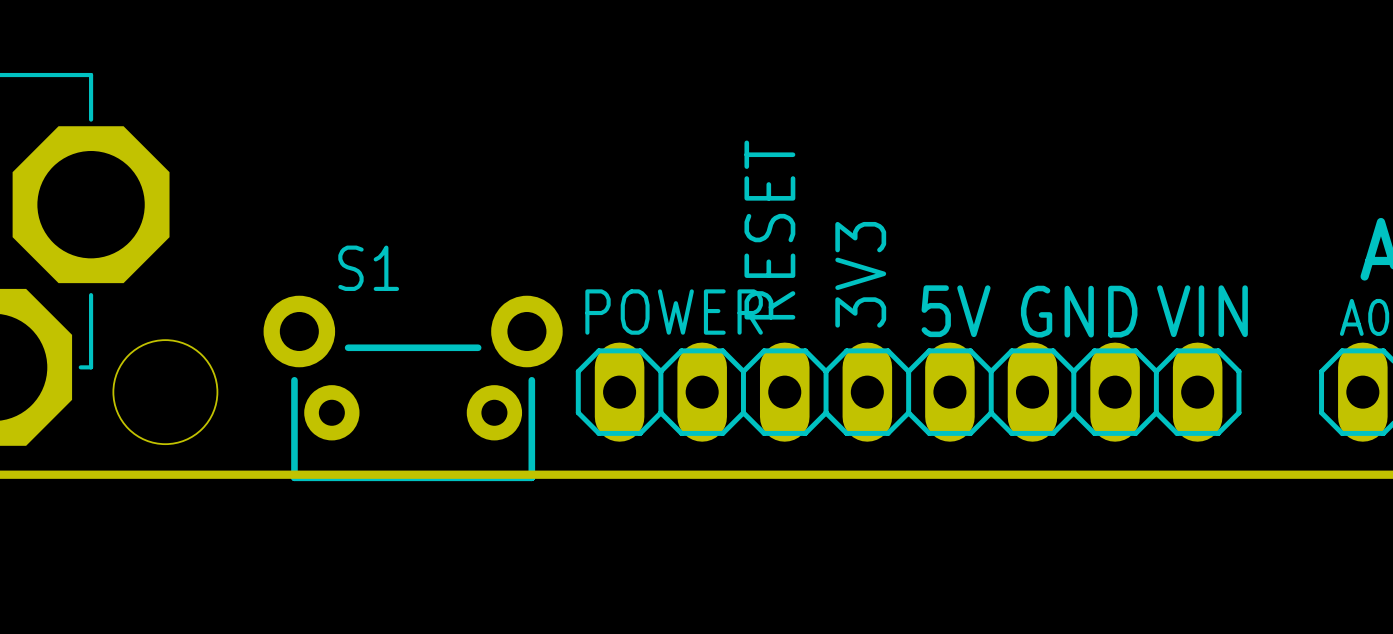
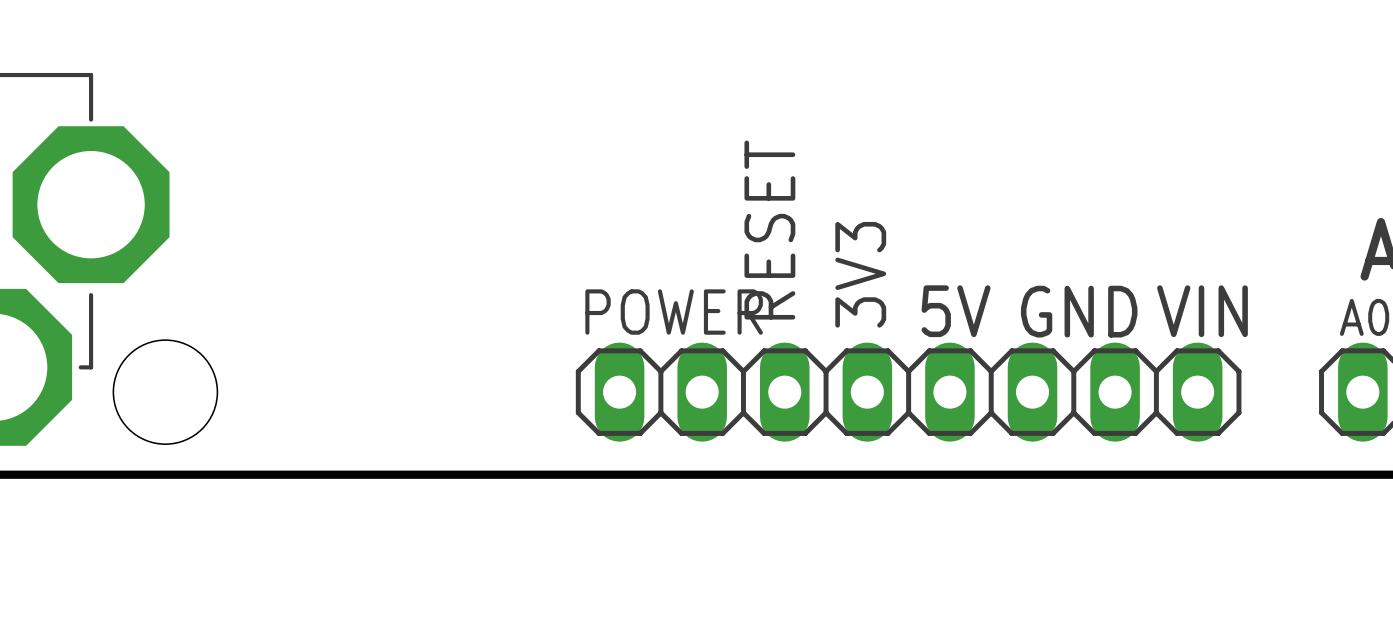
S1: (413, 388) -> none

